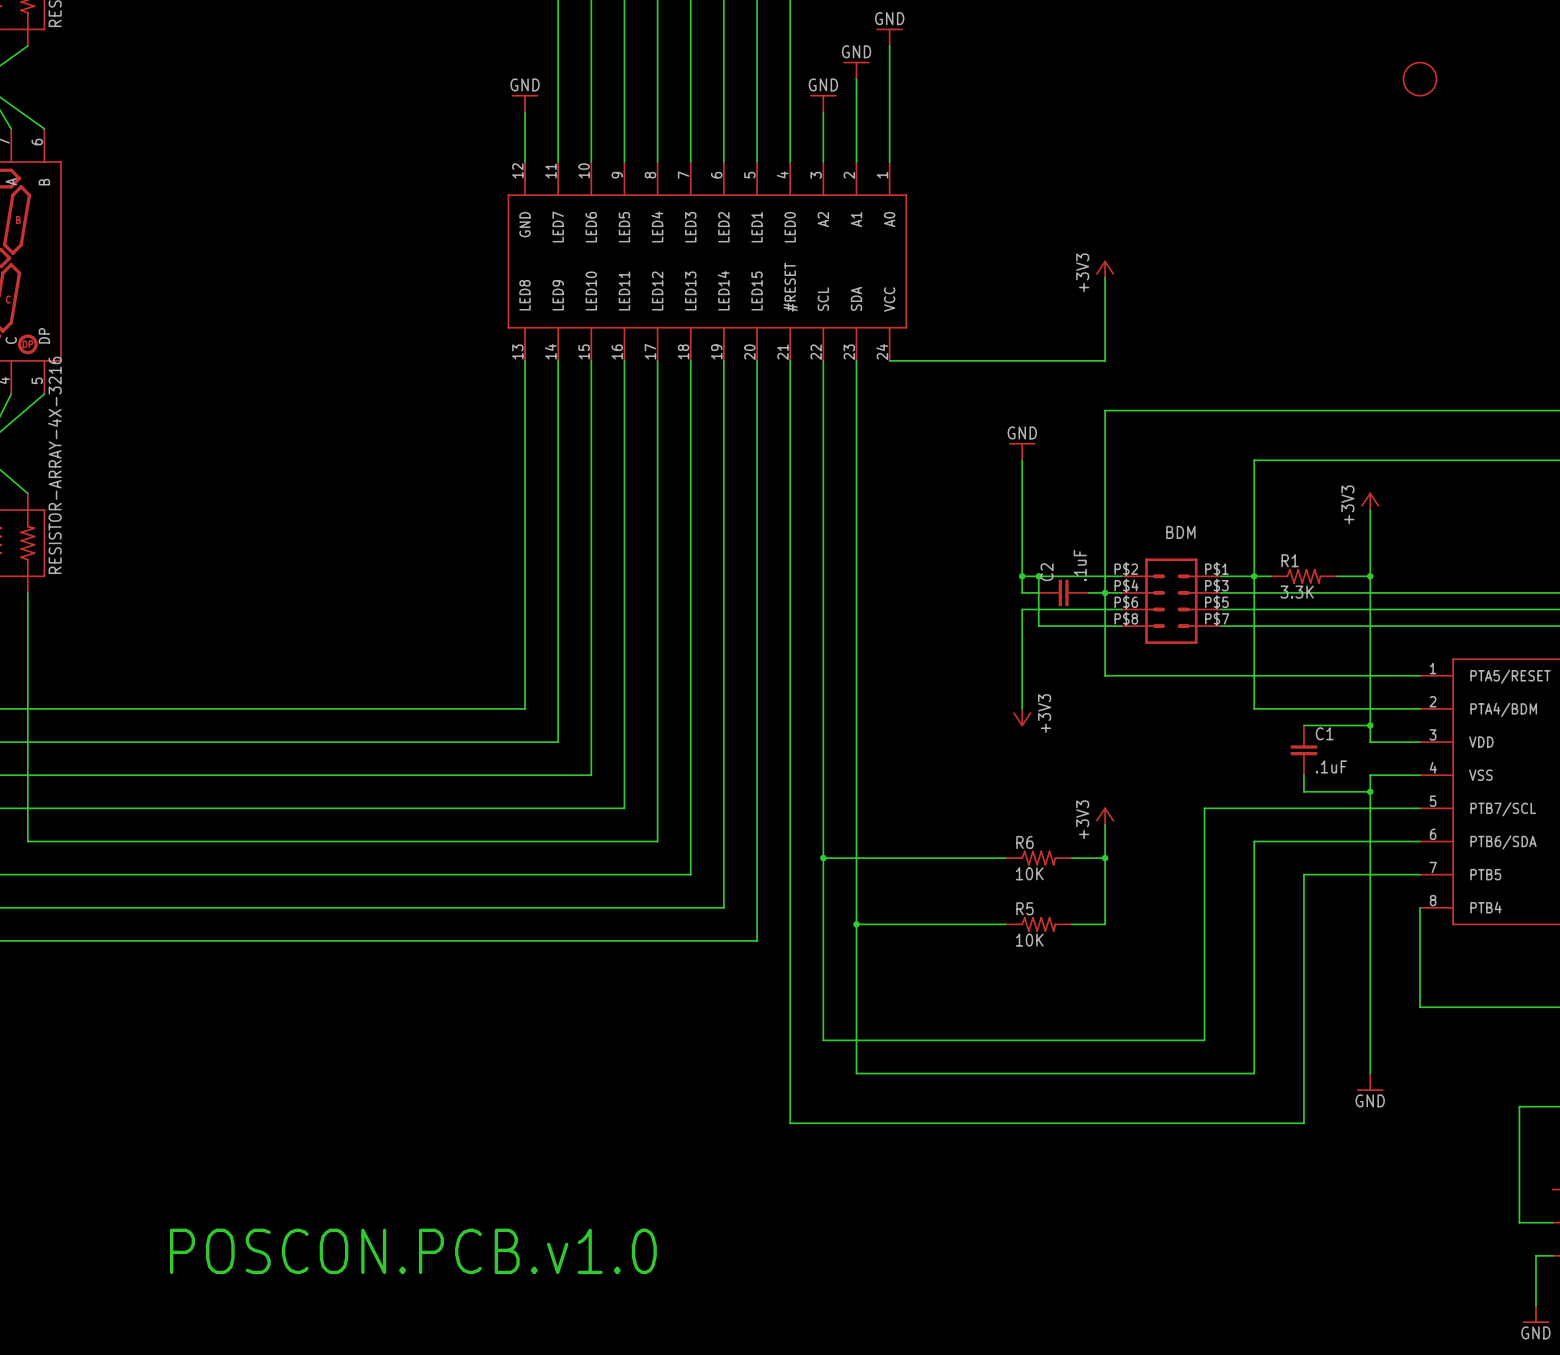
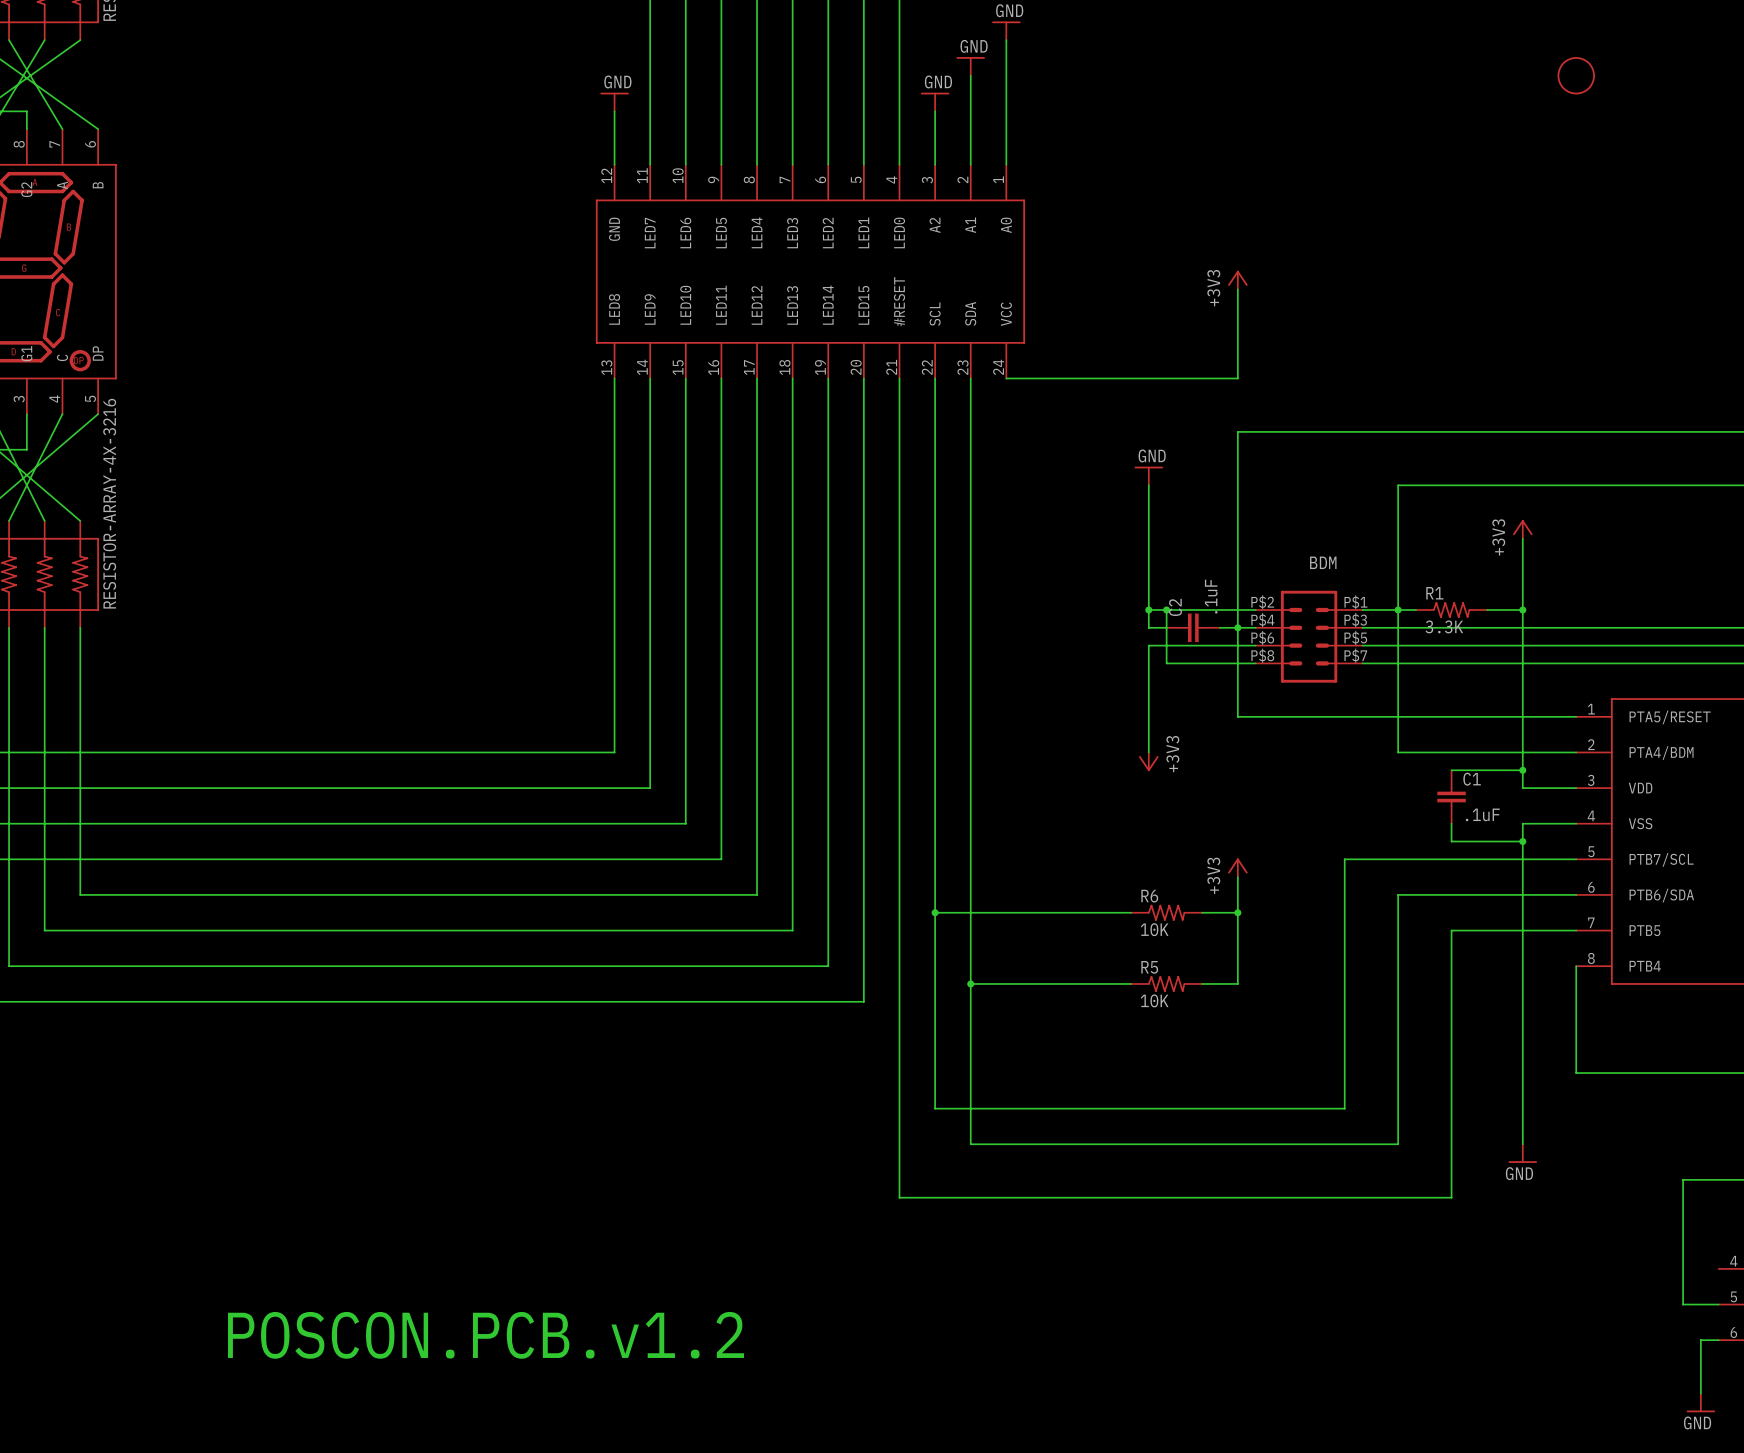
text: POSCON.PCB.v1.0 (413, 1251) -> POSCON.PCB.v1.2 (486, 1335)

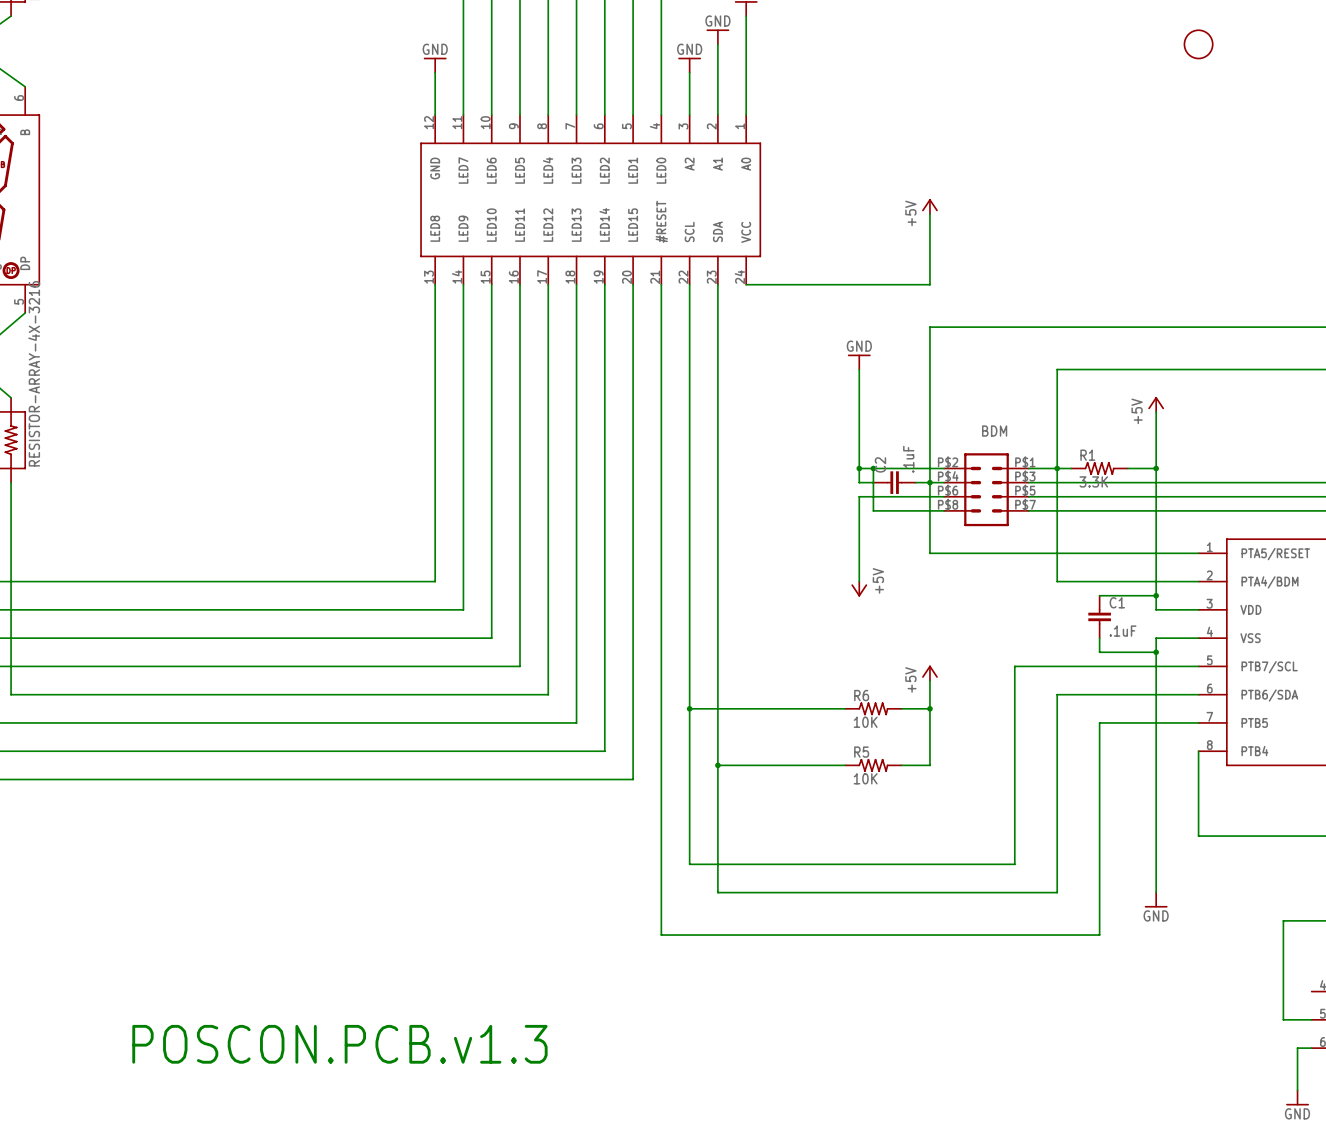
power symbol: +3V3 (1237, 280) -> +5V (929, 206)
power symbol: +3V3 (1522, 529) -> +5V (1156, 404)
power symbol: +3V3 (1148, 761) -> +5V (859, 589)
power symbol: +3V3 (1237, 867) -> +5V (929, 673)
text: POSCON.PCB.v1.2 (486, 1335) -> POSCON.PCB.v1.3 (339, 1044)

